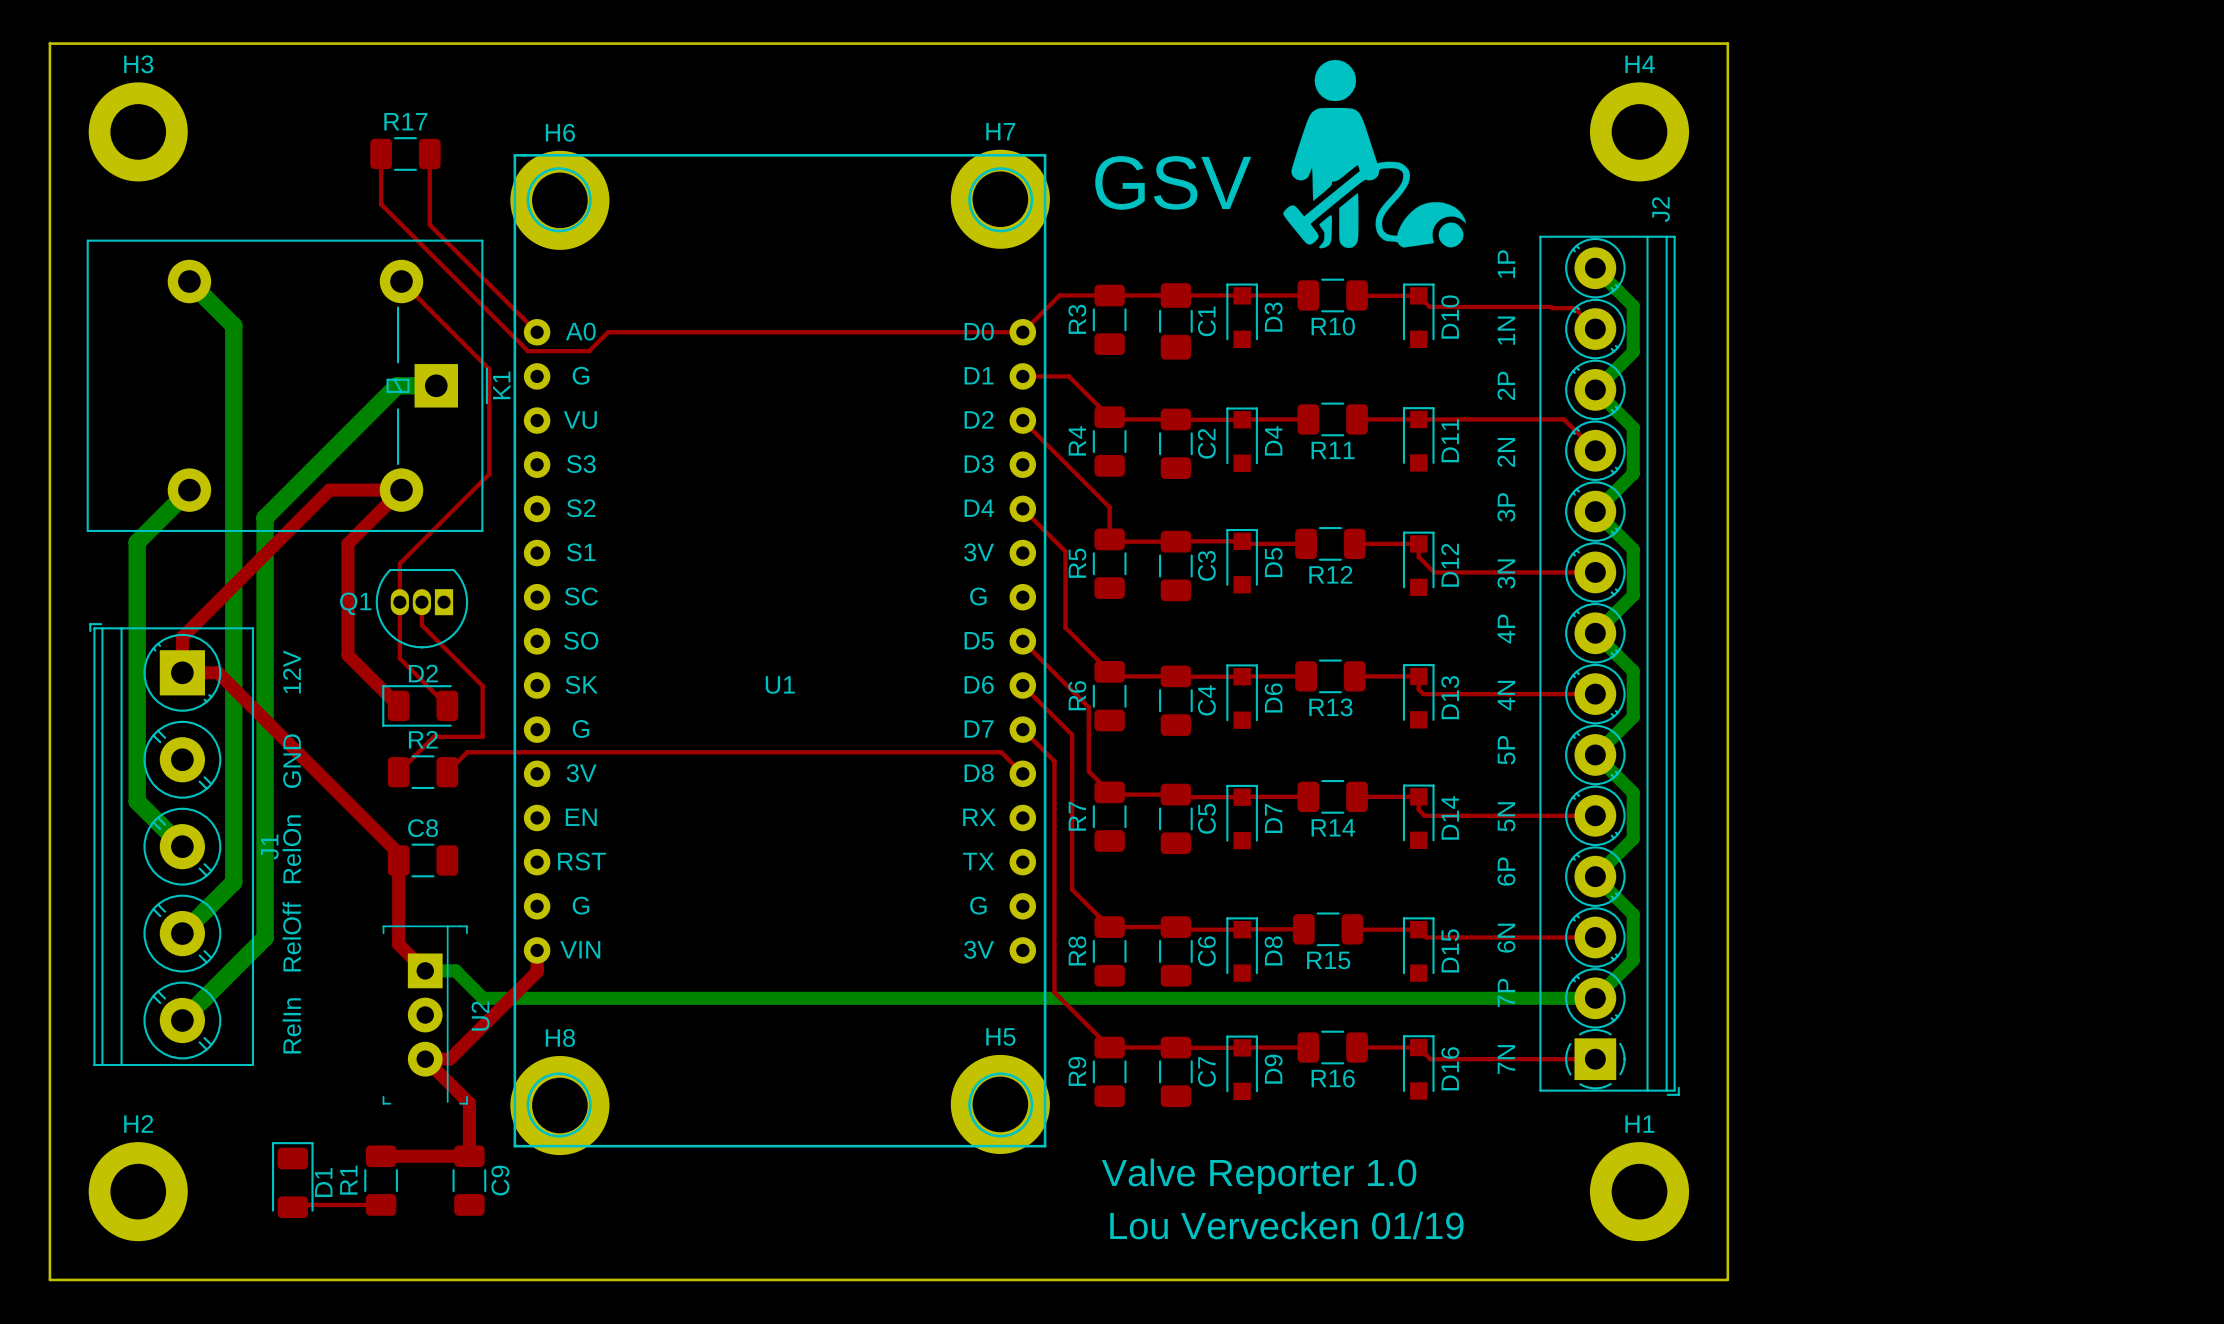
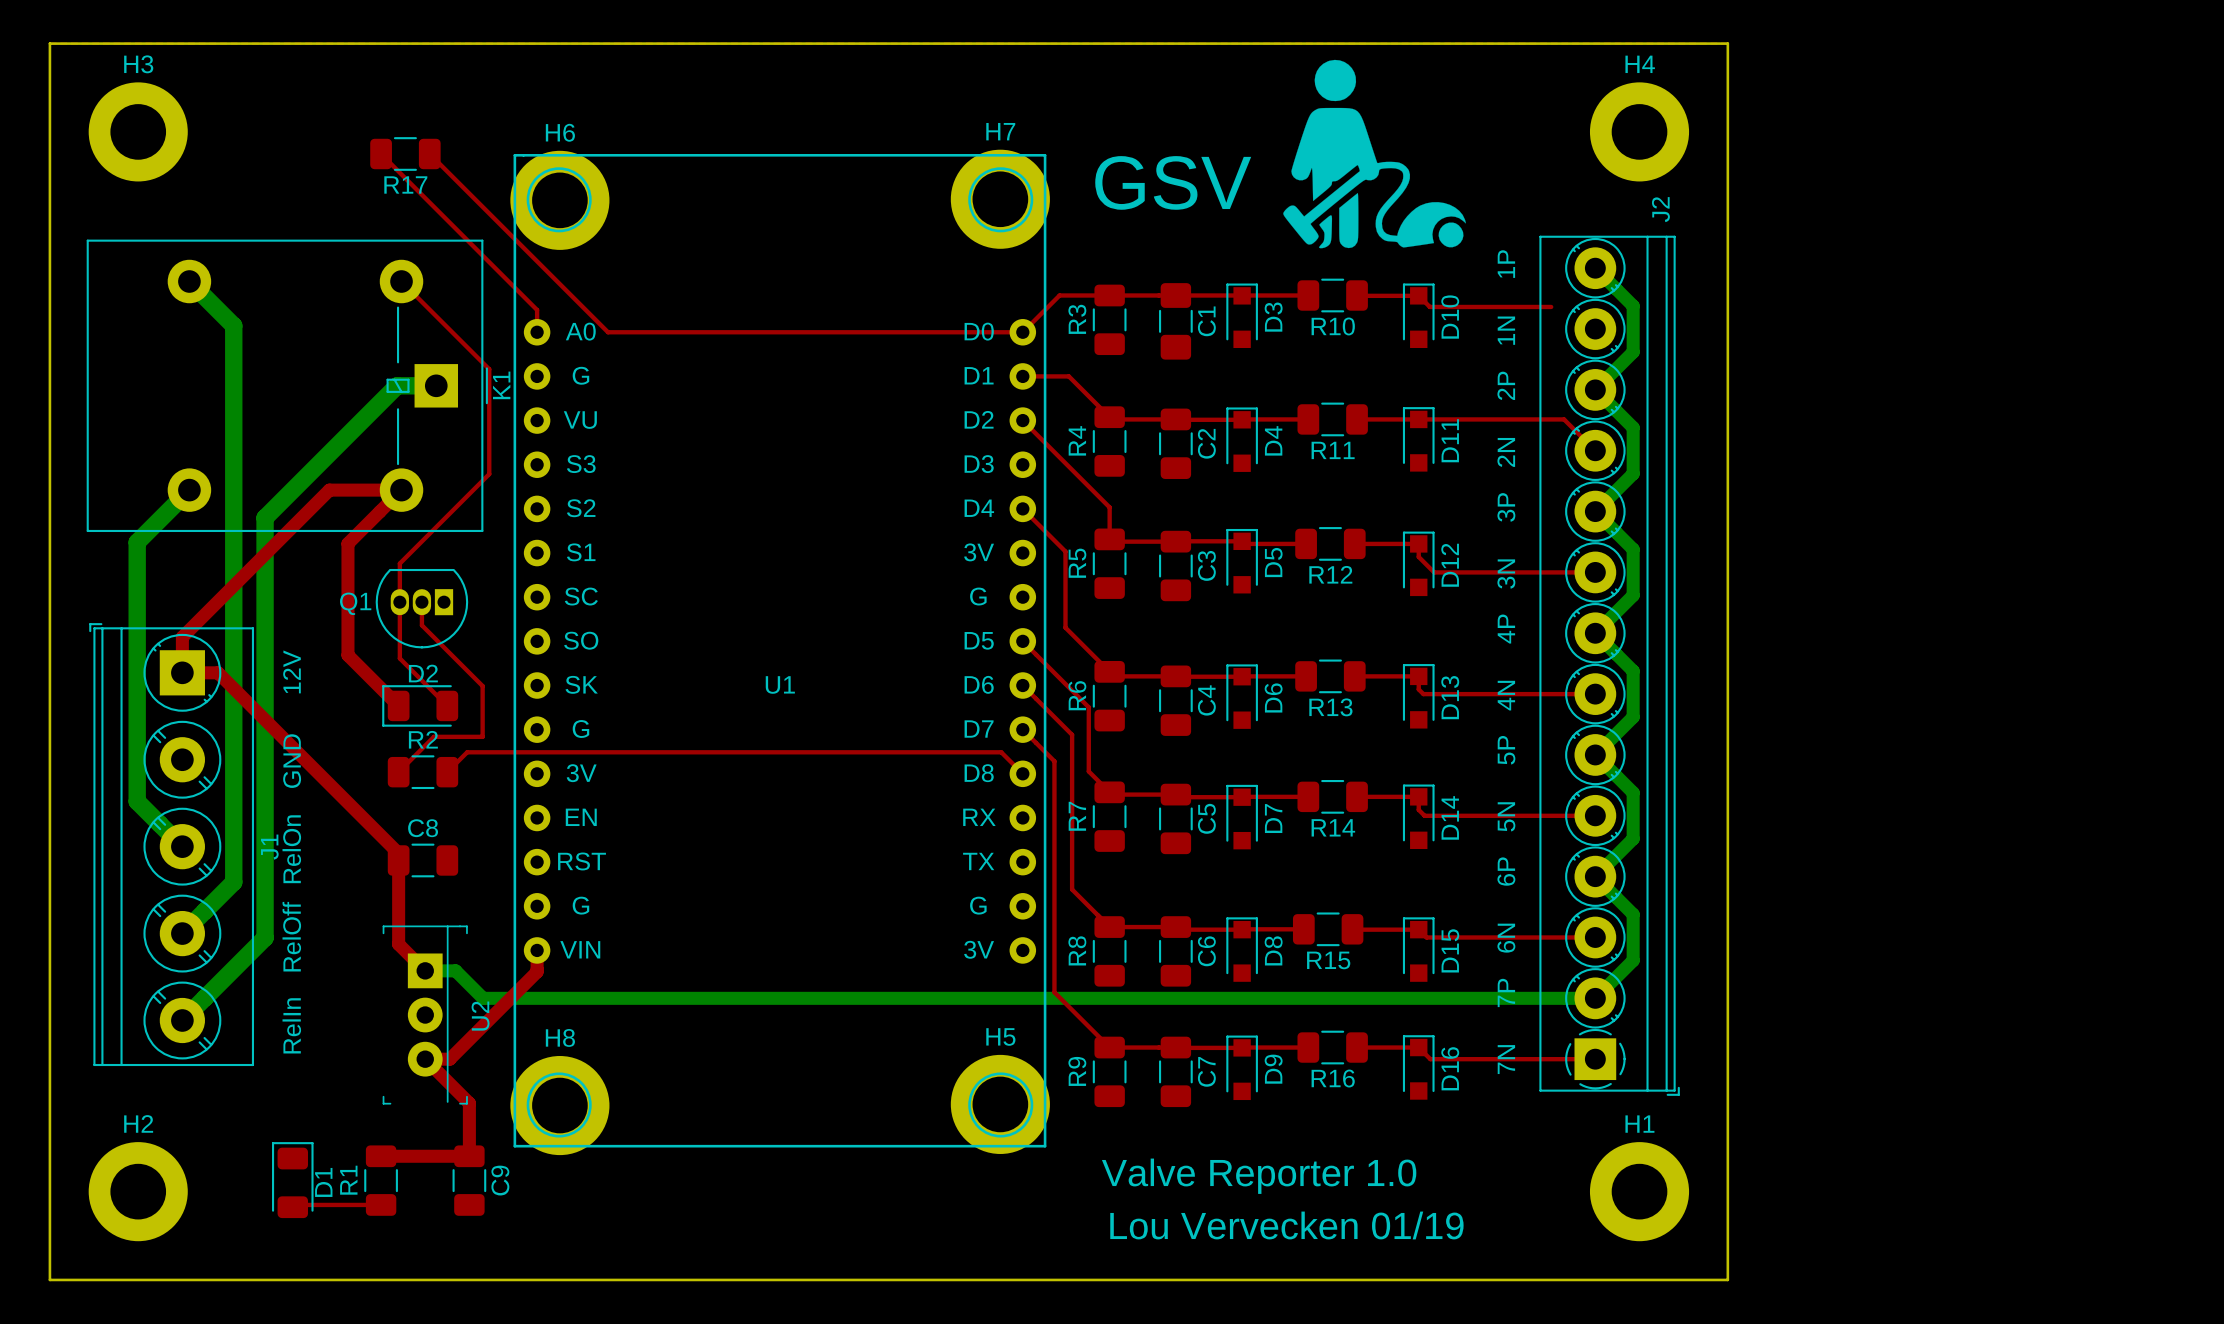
R17 name position: R17 (405, 121) -> R17 (405, 184)
top track: (381, 153) (381, 204) (528, 351) (589, 351) (608, 332) -> (429, 153) (608, 332)
top track: (429, 153) (429, 224) (537, 332) -> (381, 153) (537, 310) (537, 332)
top track: (1551, 306) (1574, 308) (1595, 329) -> none

